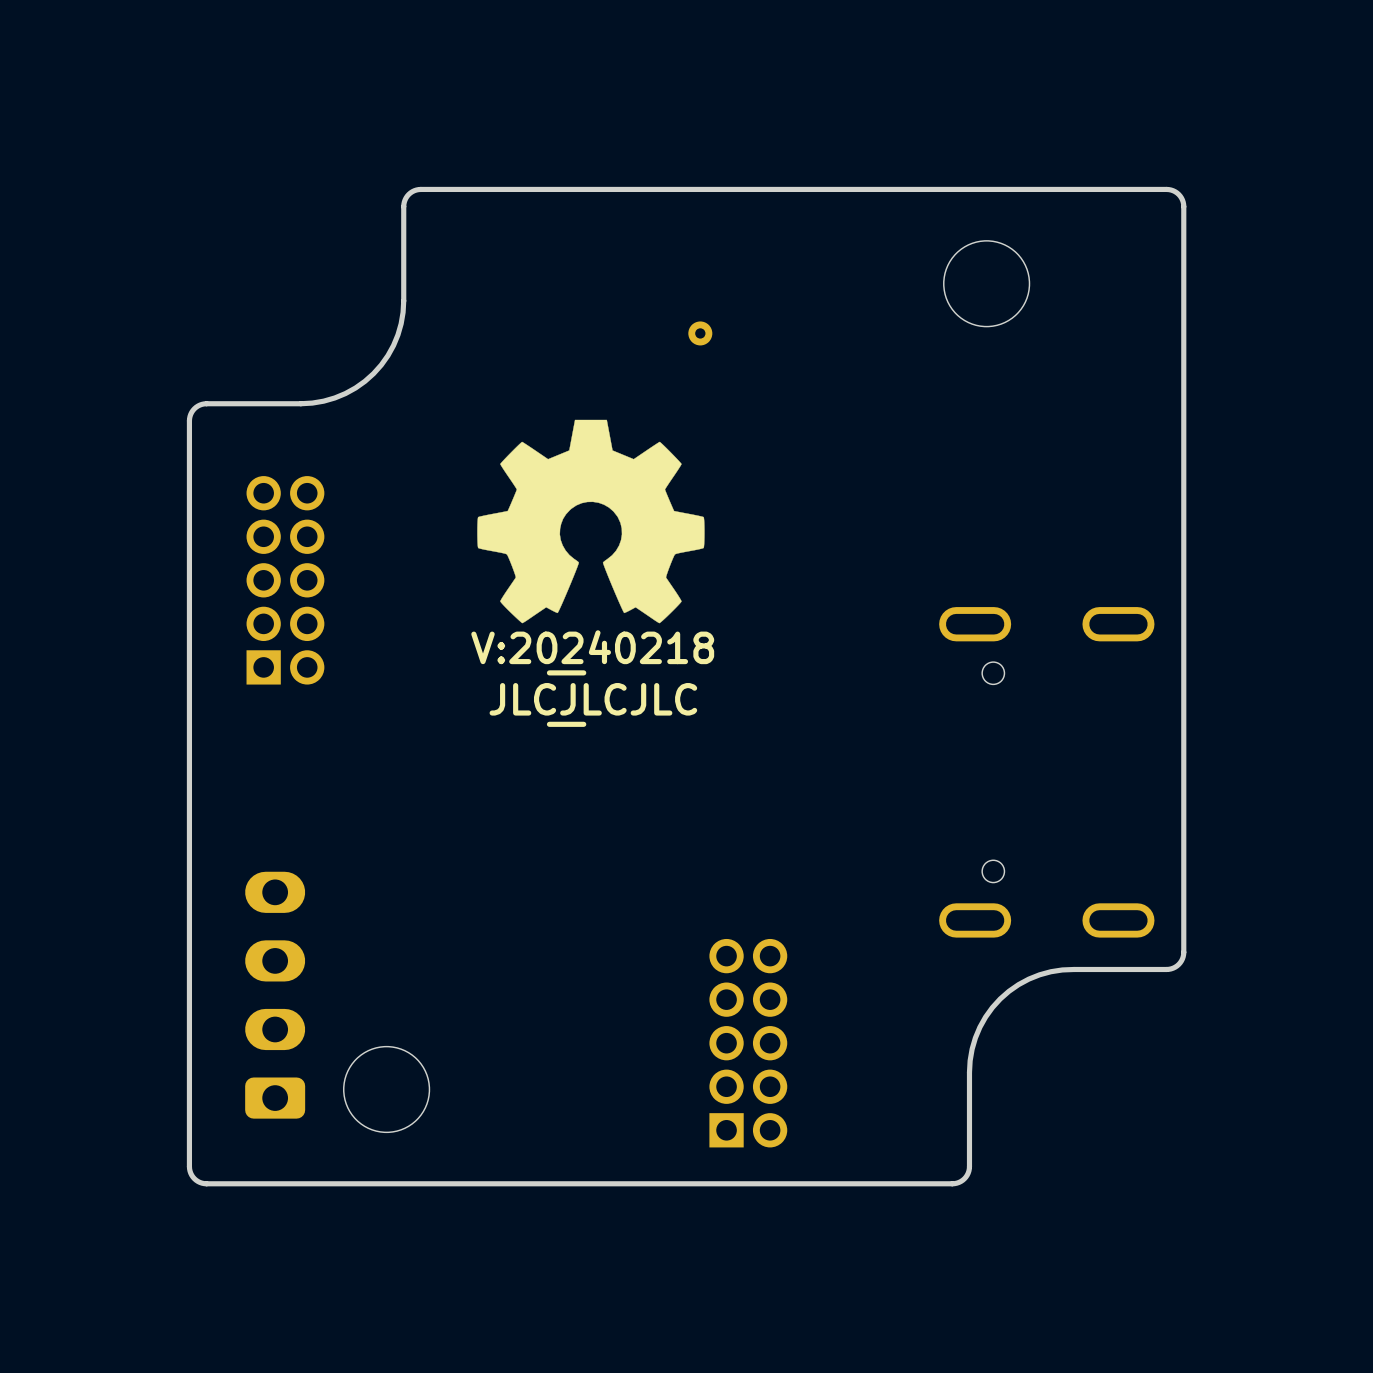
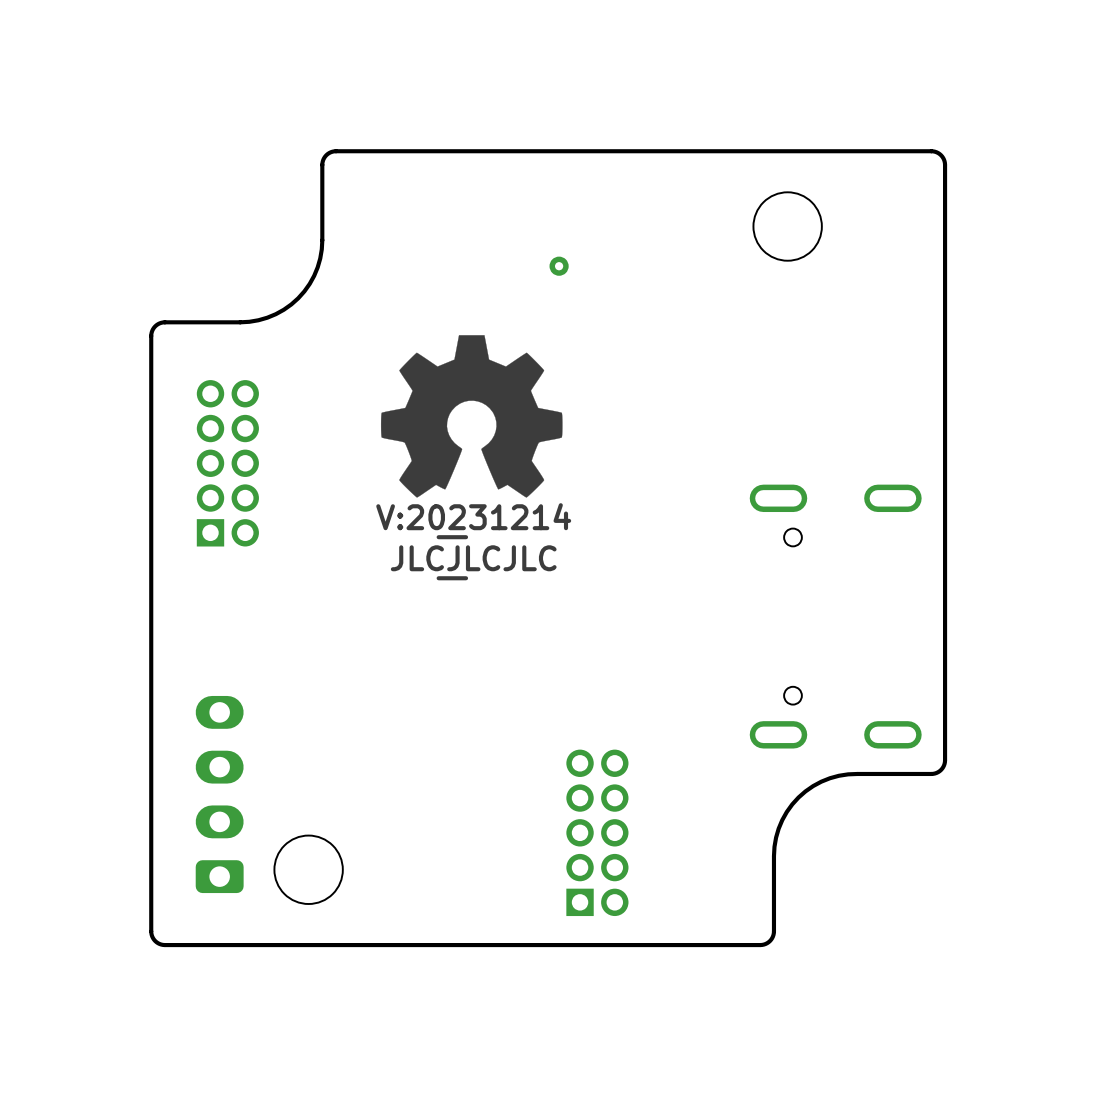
drawing shape: [471, 630, 715, 676] -> [376, 503, 572, 540]

